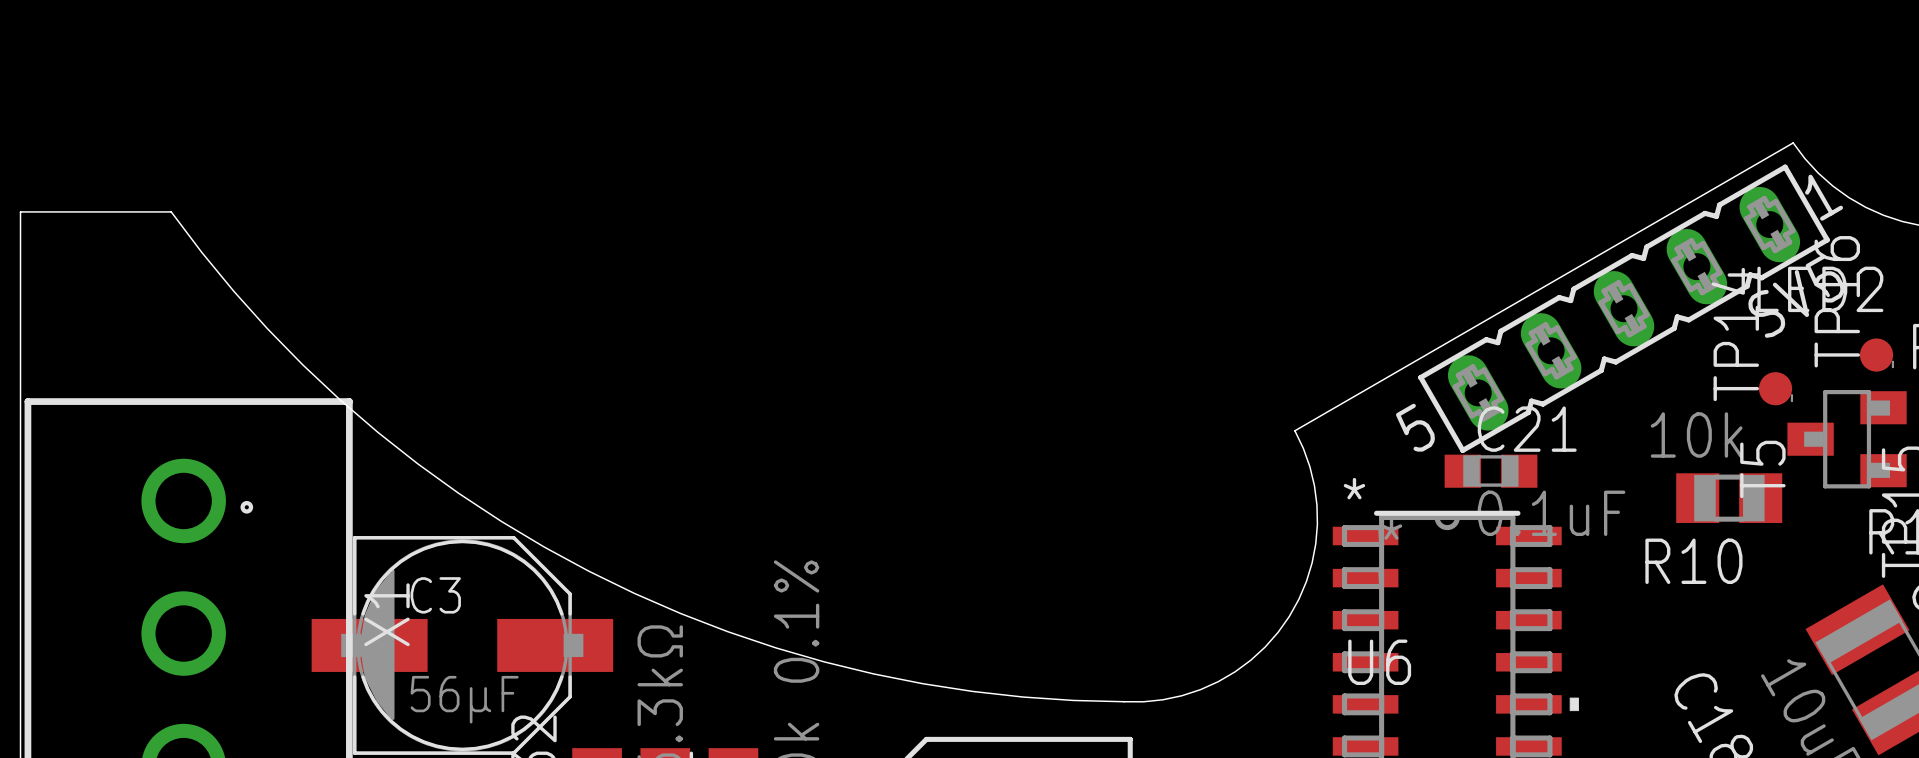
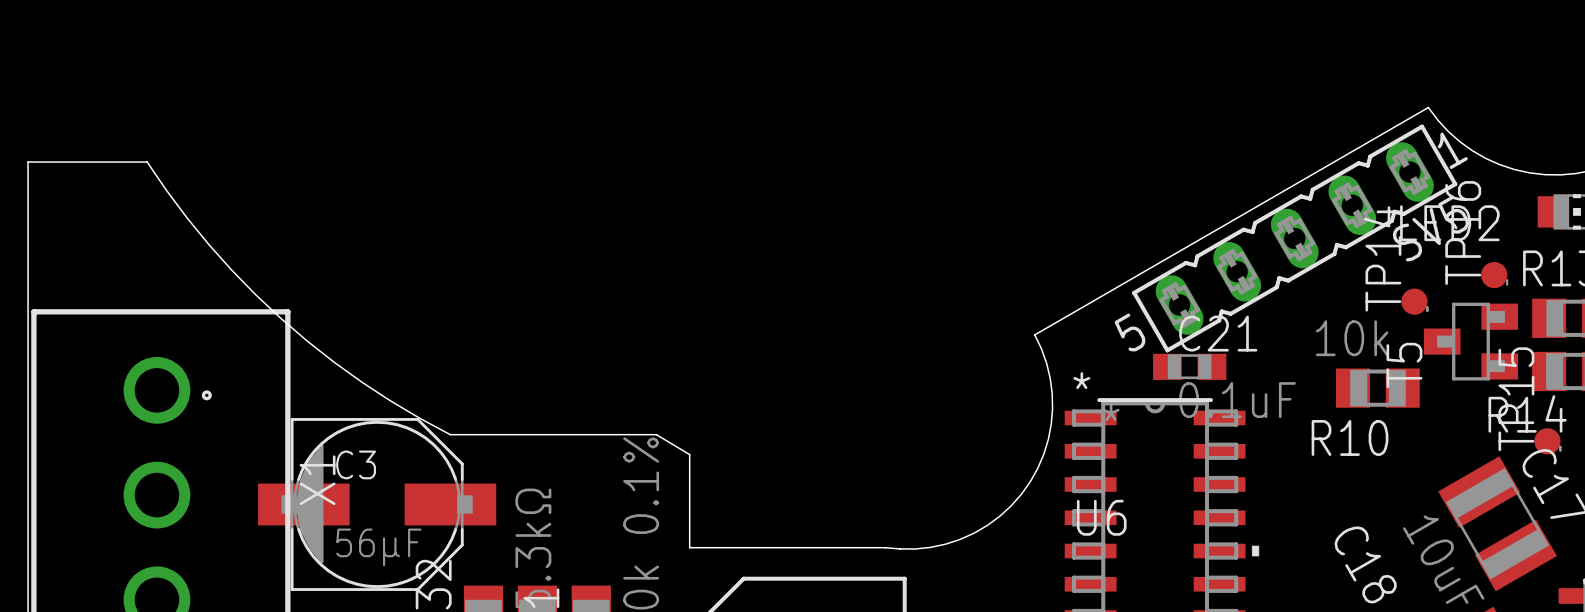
board edge: (171, 211) (233, 291) (302, 365) (339, 399) (378, 432) (458, 493) (544, 547) (588, 571) (634, 593) (727, 631) (824, 661) (873, 673) (922, 683) (1023, 697) (1124, 701) -> (147, 162) (208, 244) (280, 318) (361, 382) (450, 434) (656, 434) (689, 454) (689, 547) (899, 548)

